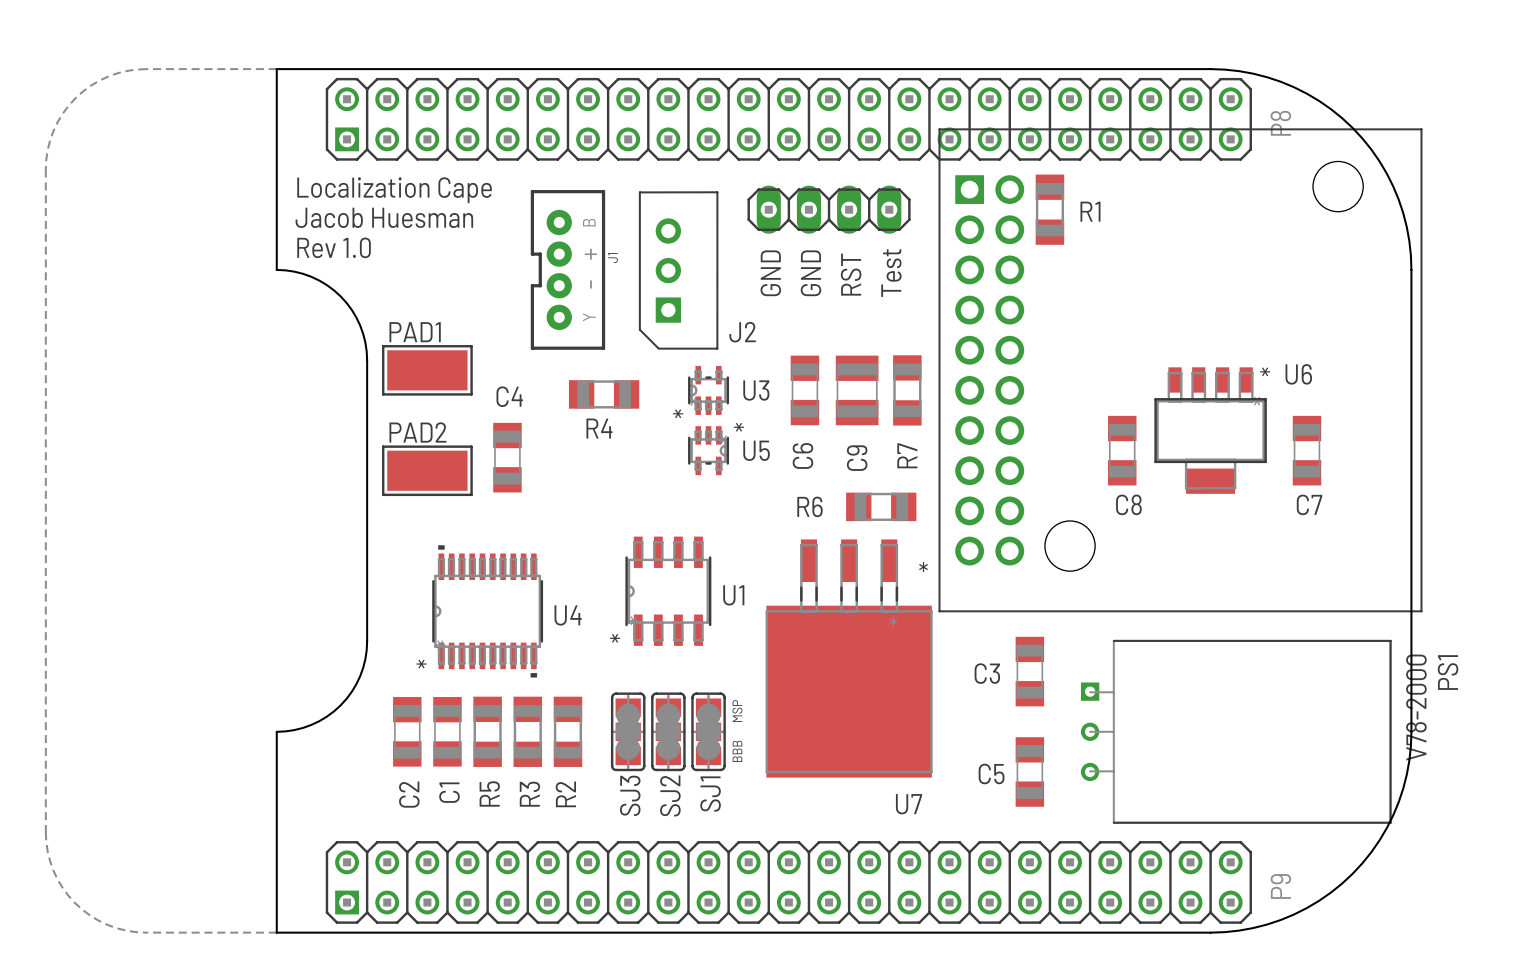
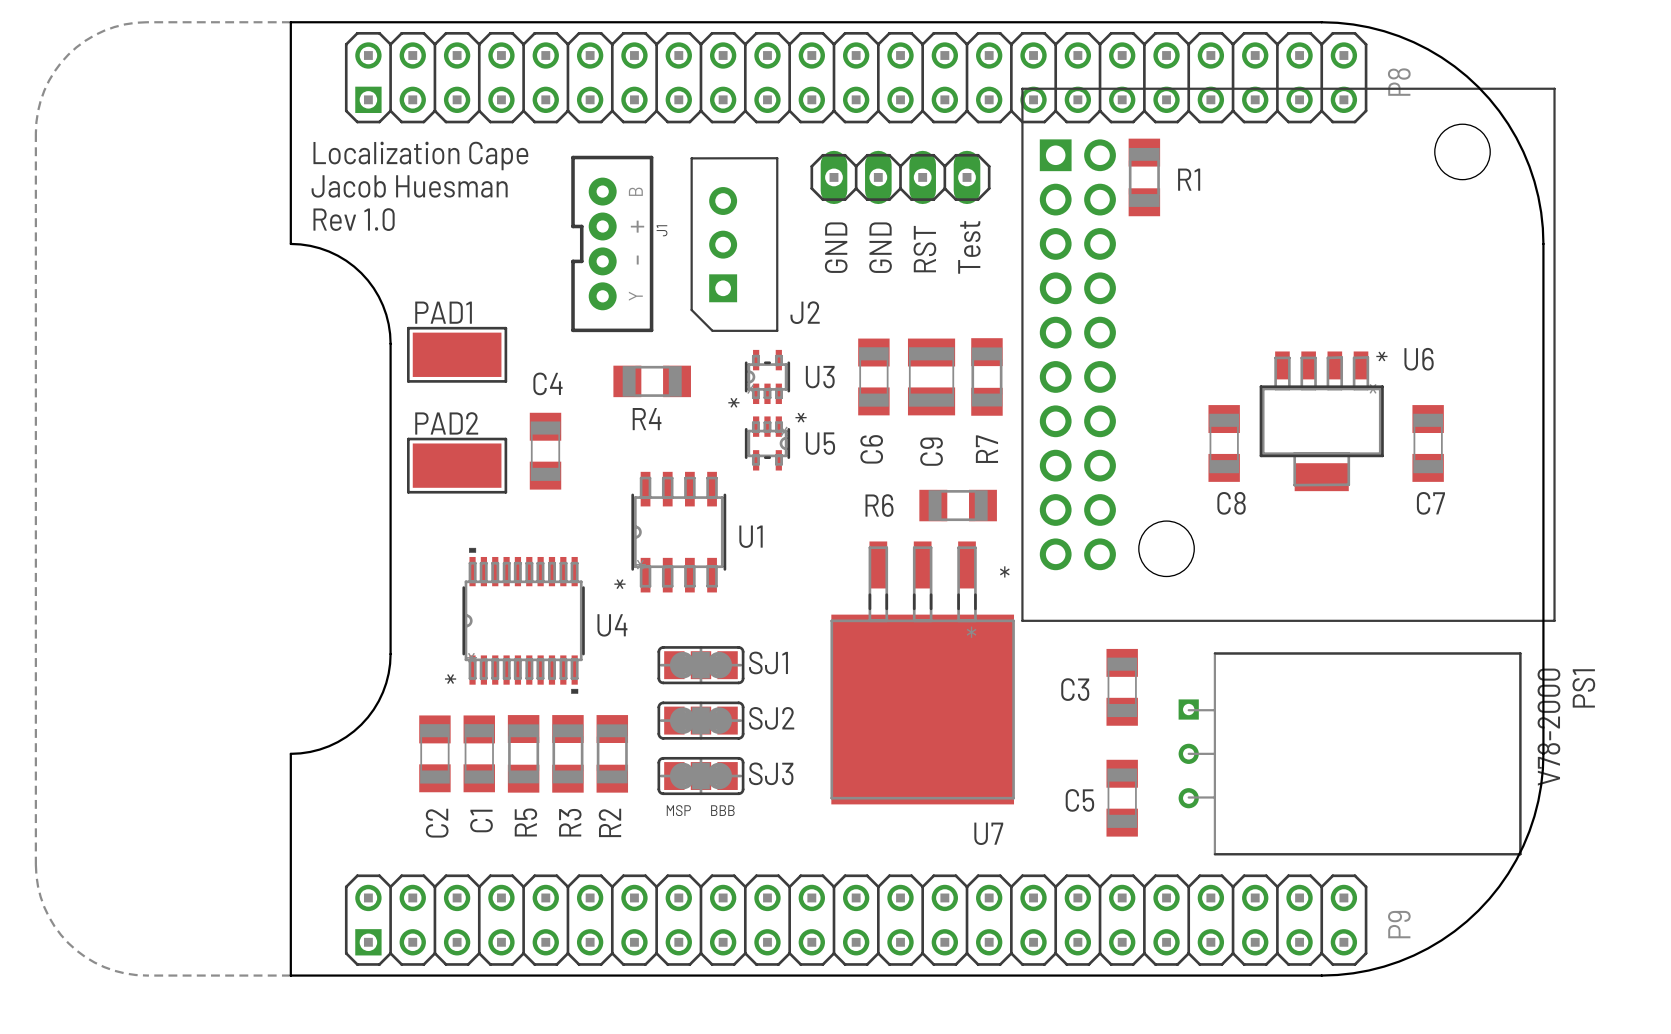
U1 position: (668, 591) -> (678, 532)
text rotation: 0° (737, 711) -> 90° clockwise (678, 810)
text position: MSP (737, 711) -> MSP (678, 810)
SJ3 rotation: 0° (628, 731) -> 90° clockwise (700, 776)
SJ2 rotation: 0° (668, 731) -> 90° clockwise (700, 720)
SJ1 rotation: 0° (708, 731) -> 90° clockwise (700, 665)
SJ1 position: (708, 731) -> (700, 665)
text rotation: 0° (737, 751) -> 90° clockwise (722, 810)
text position: BBB (737, 751) -> BBB (722, 810)
SJ1 name position: SJ1 (710, 794) -> SJ1 (768, 662)
SJ3 name position: SJ3 (630, 795) -> SJ3 (771, 773)
SJ2 name position: SJ2 (670, 795) -> SJ2 (771, 718)

